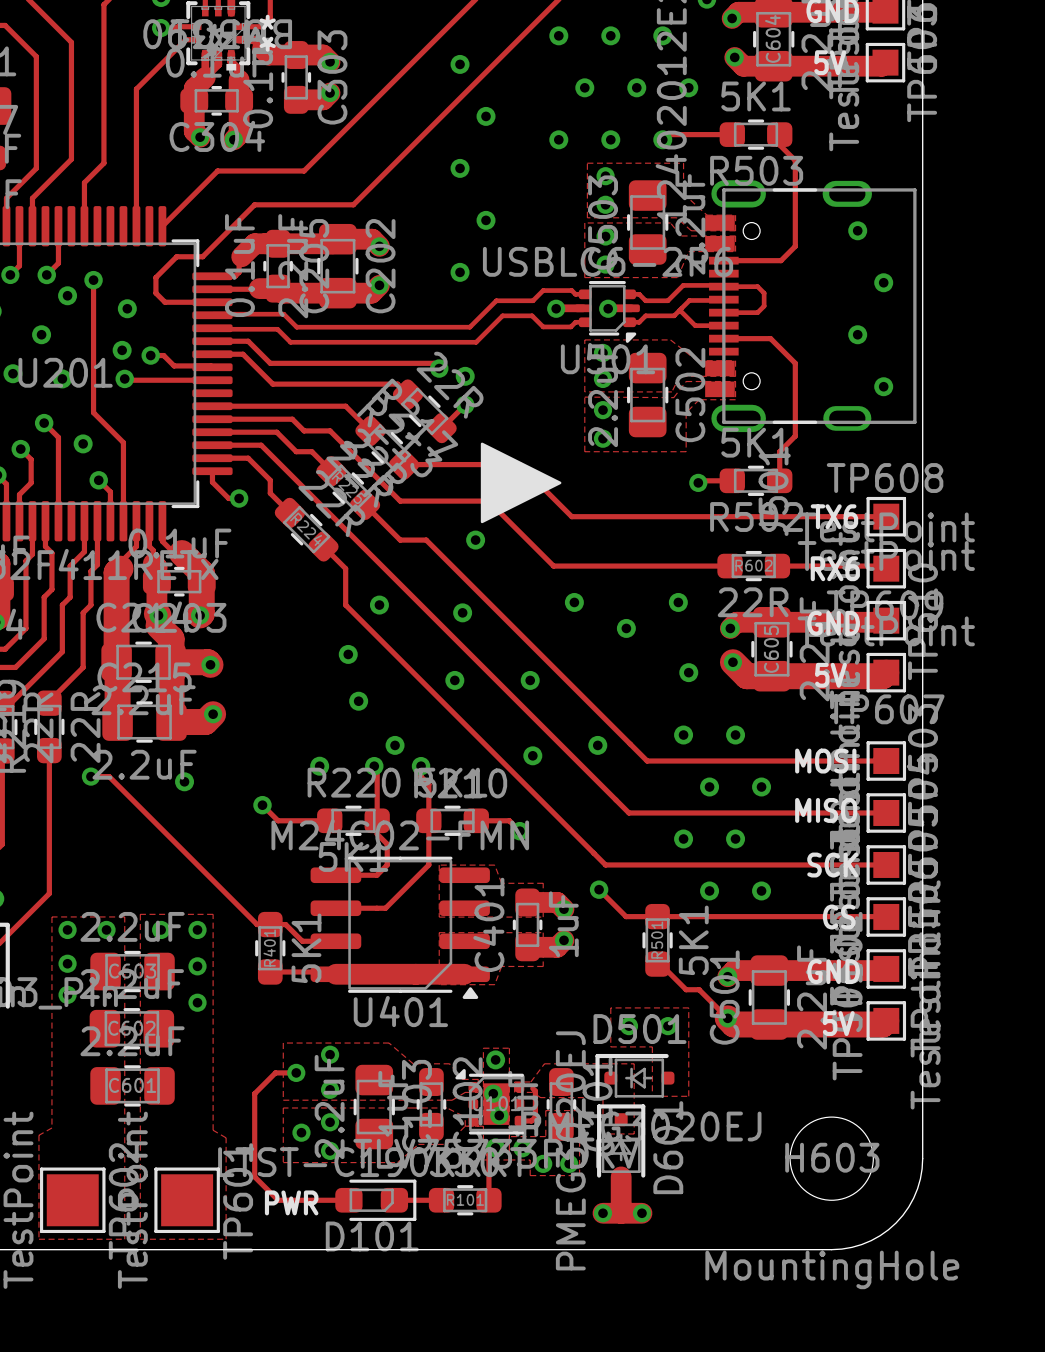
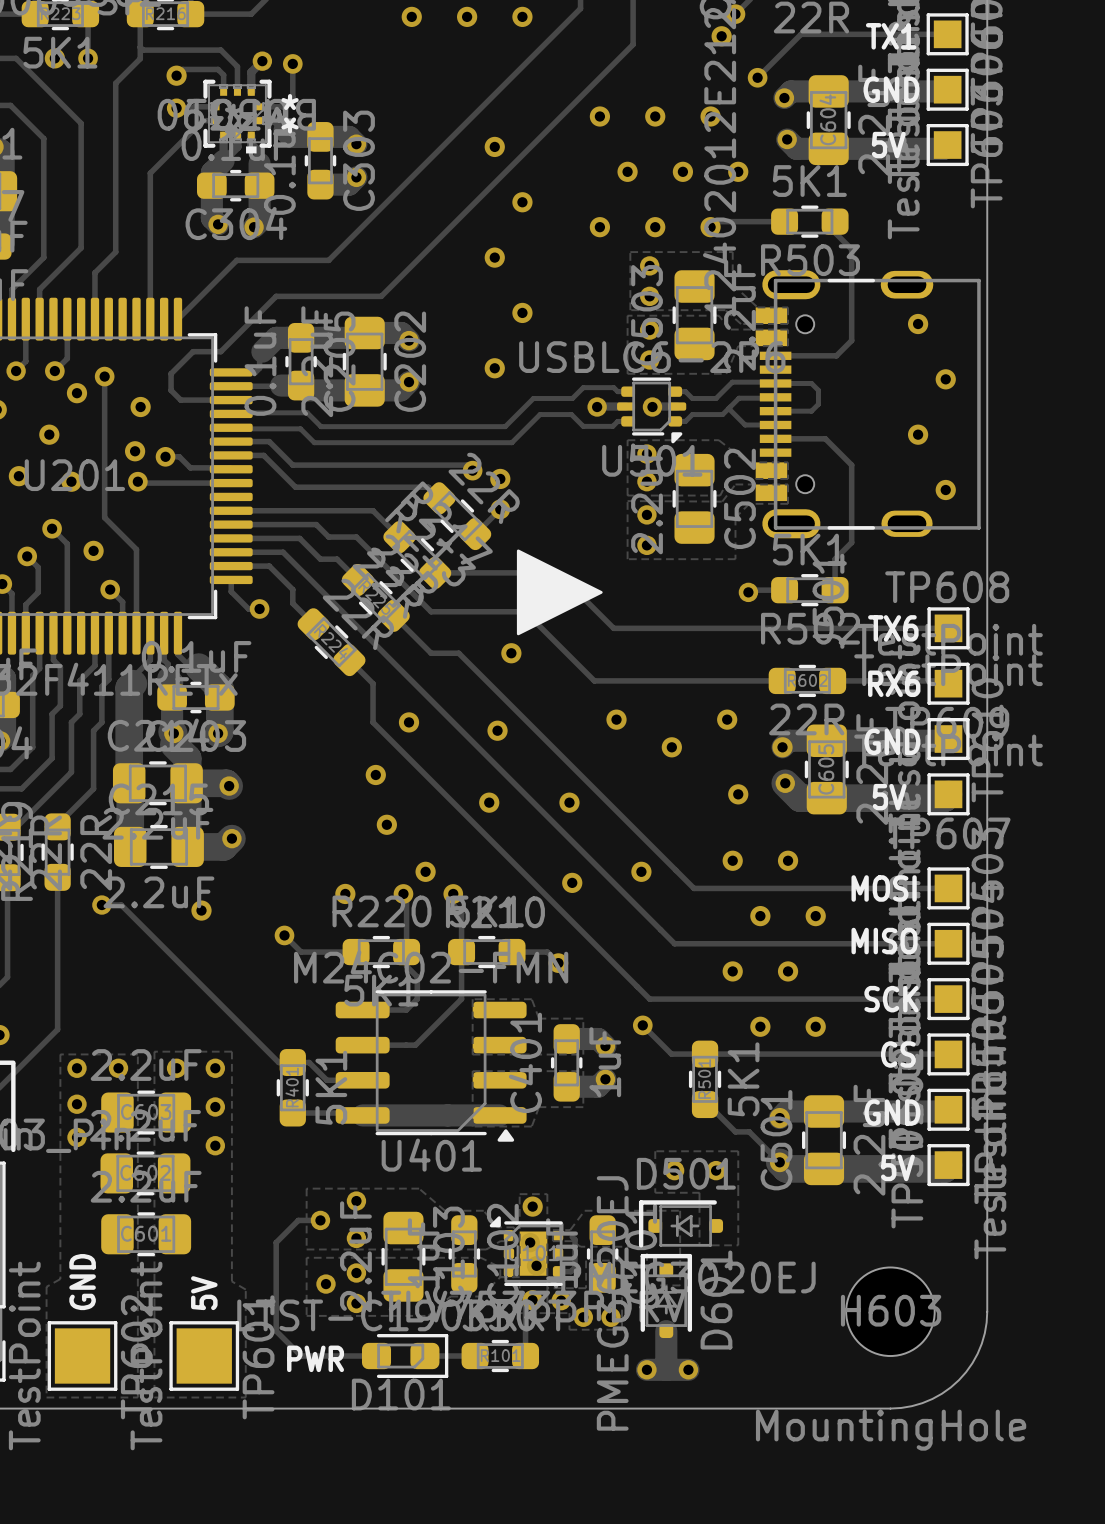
text: none -> GND (82, 1282)
text: none -> 5V (204, 1293)

